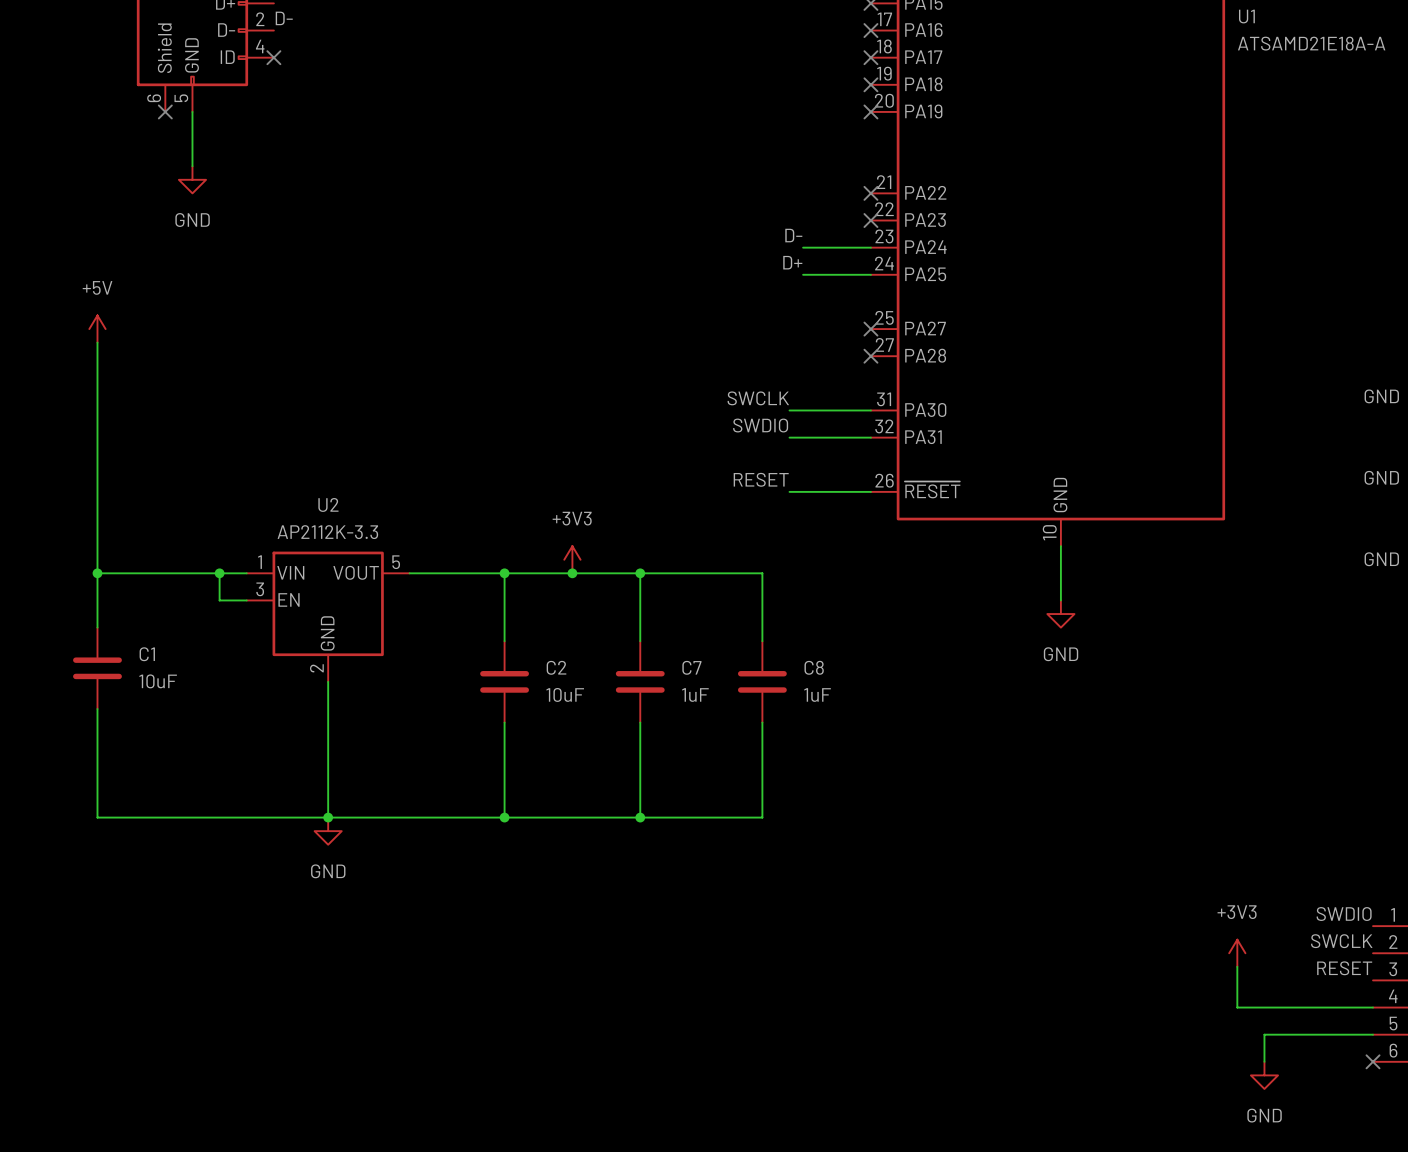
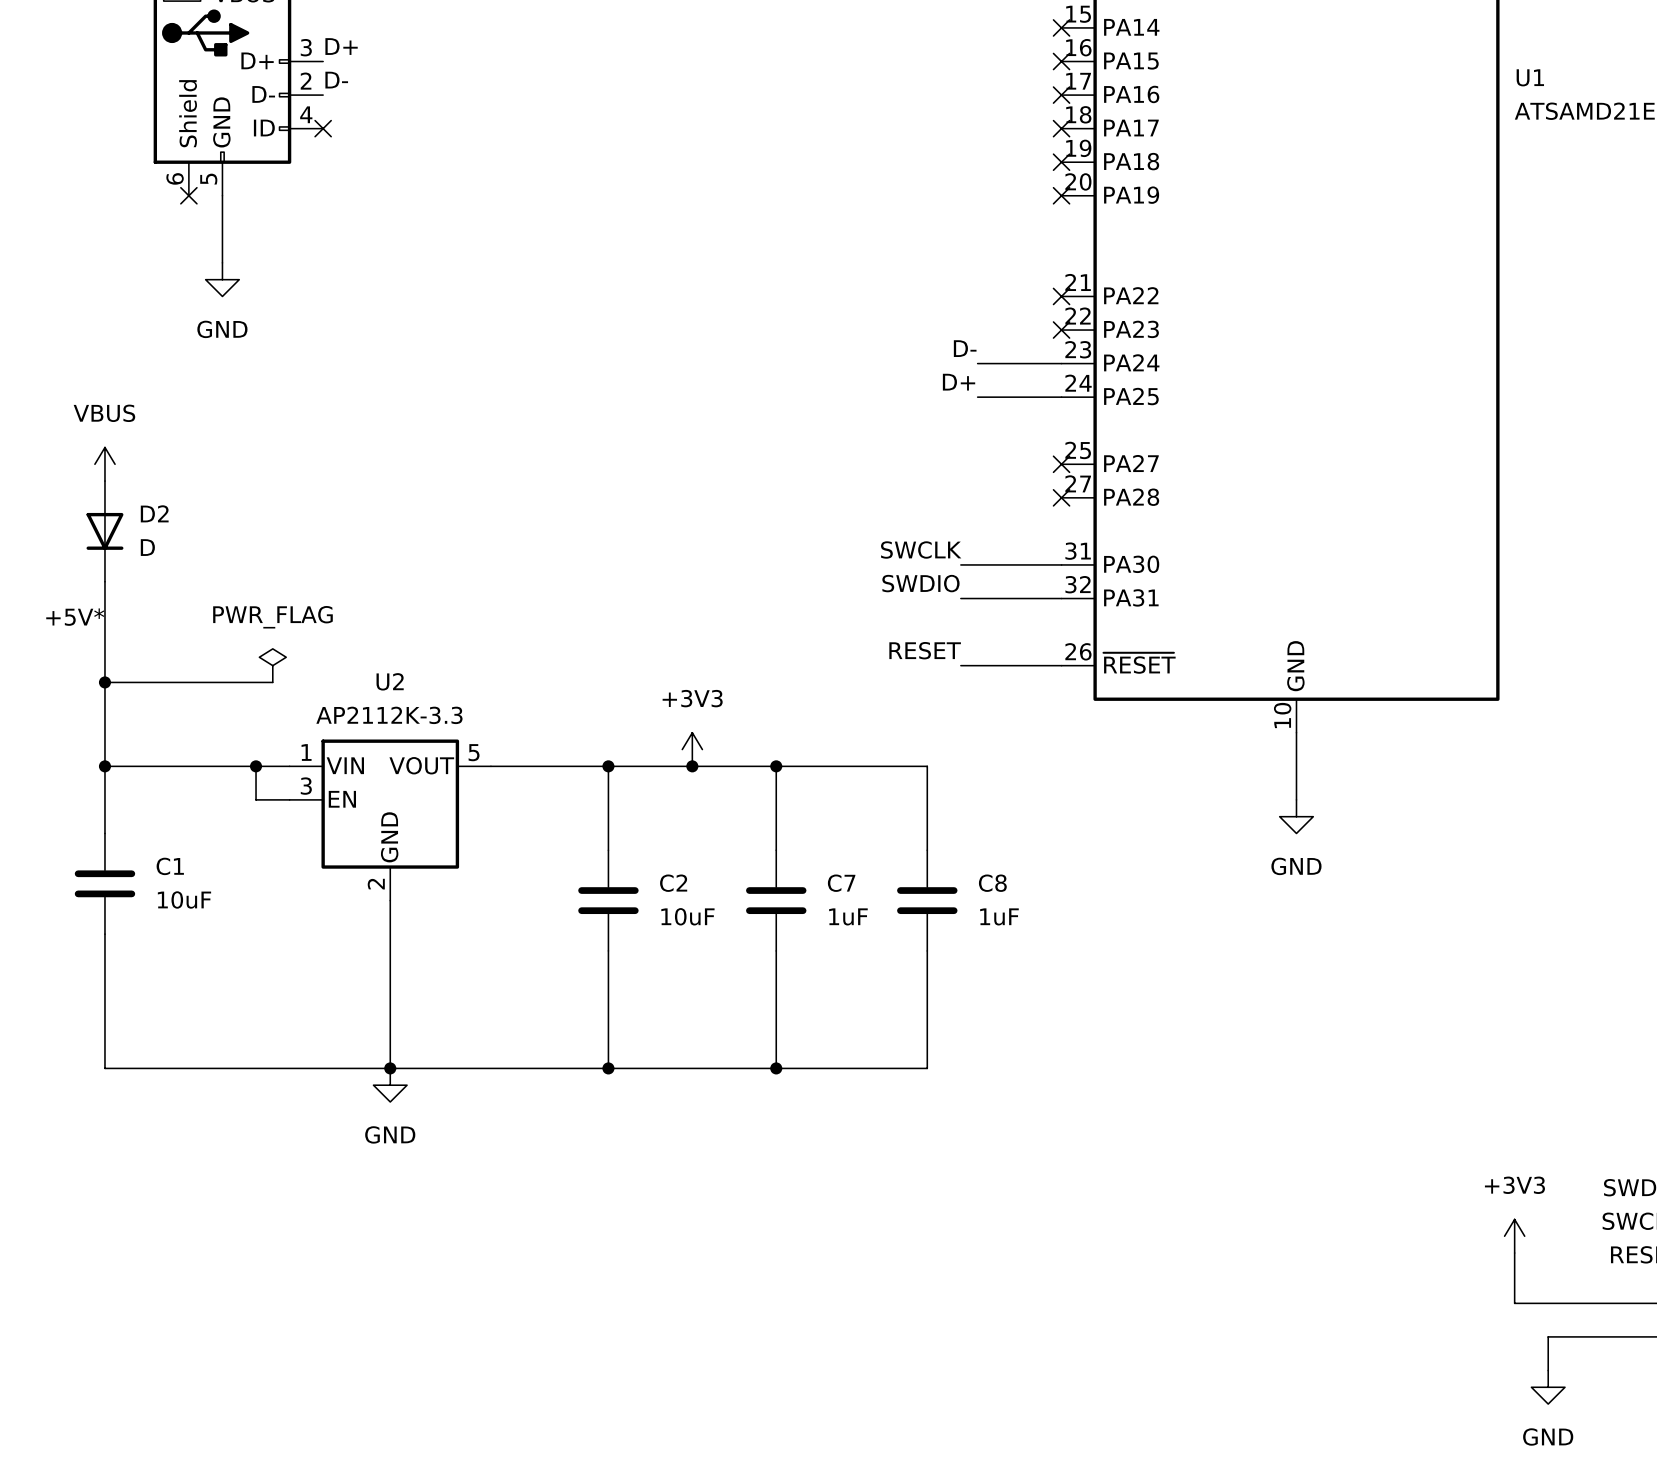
power symbol: +5V (97, 329) -> VBUS (104, 464)
D2: none -> D (104, 531)
label: none -> +5V* (75, 617)
power symbol: none -> PWR_FLAG (272, 665)
wire: none -> (104, 682) (272, 682)
junction: none -> (104, 682)

